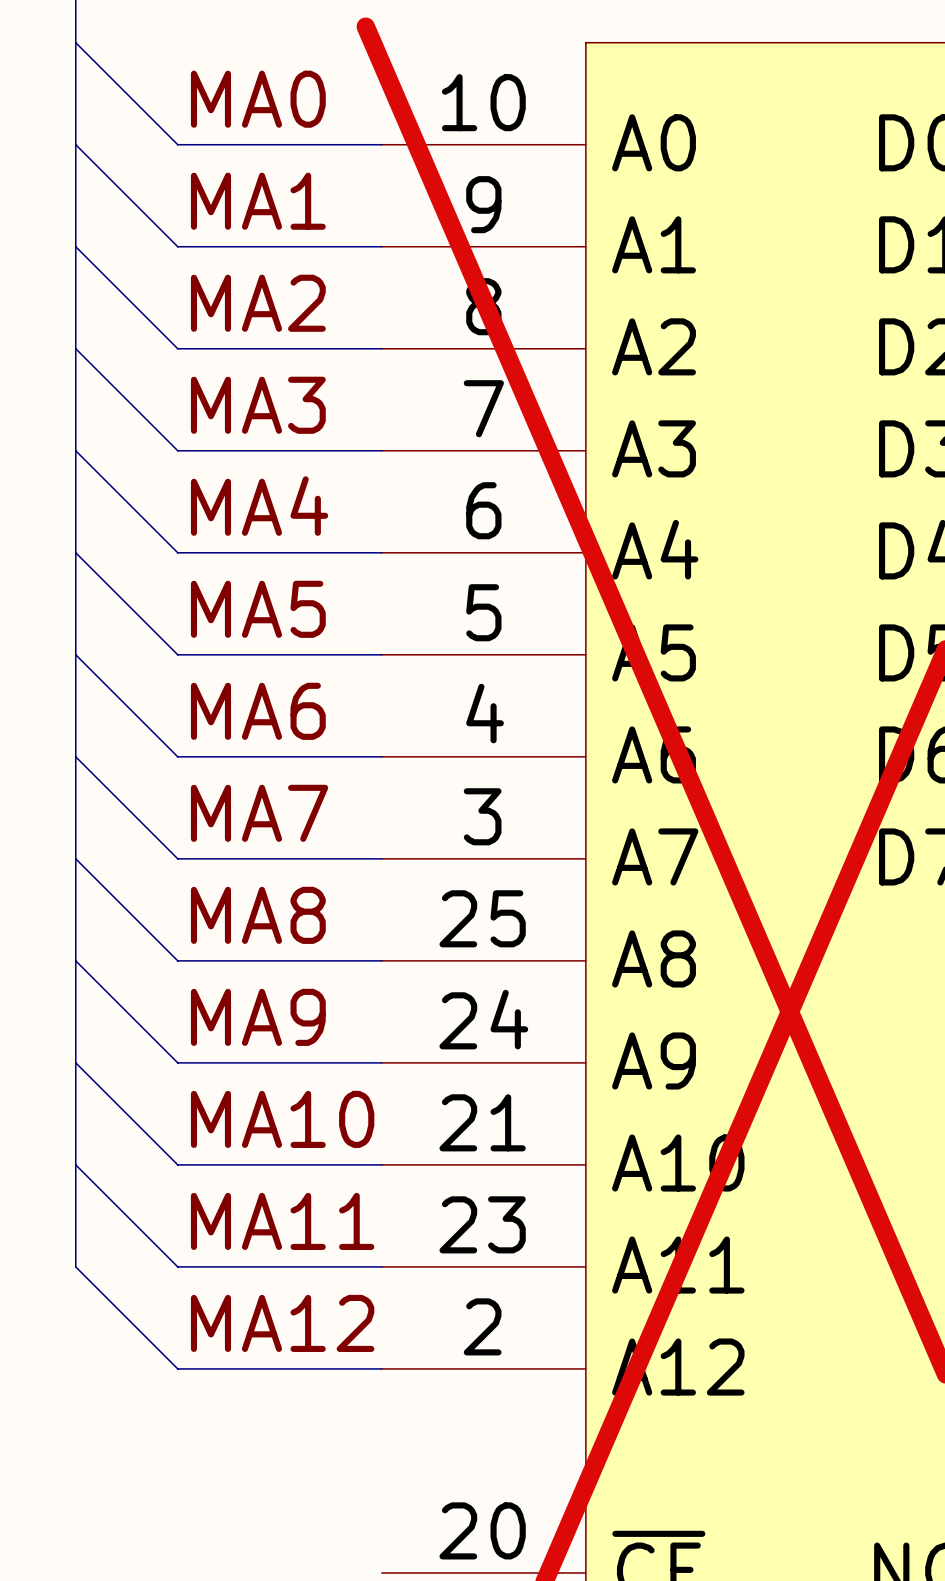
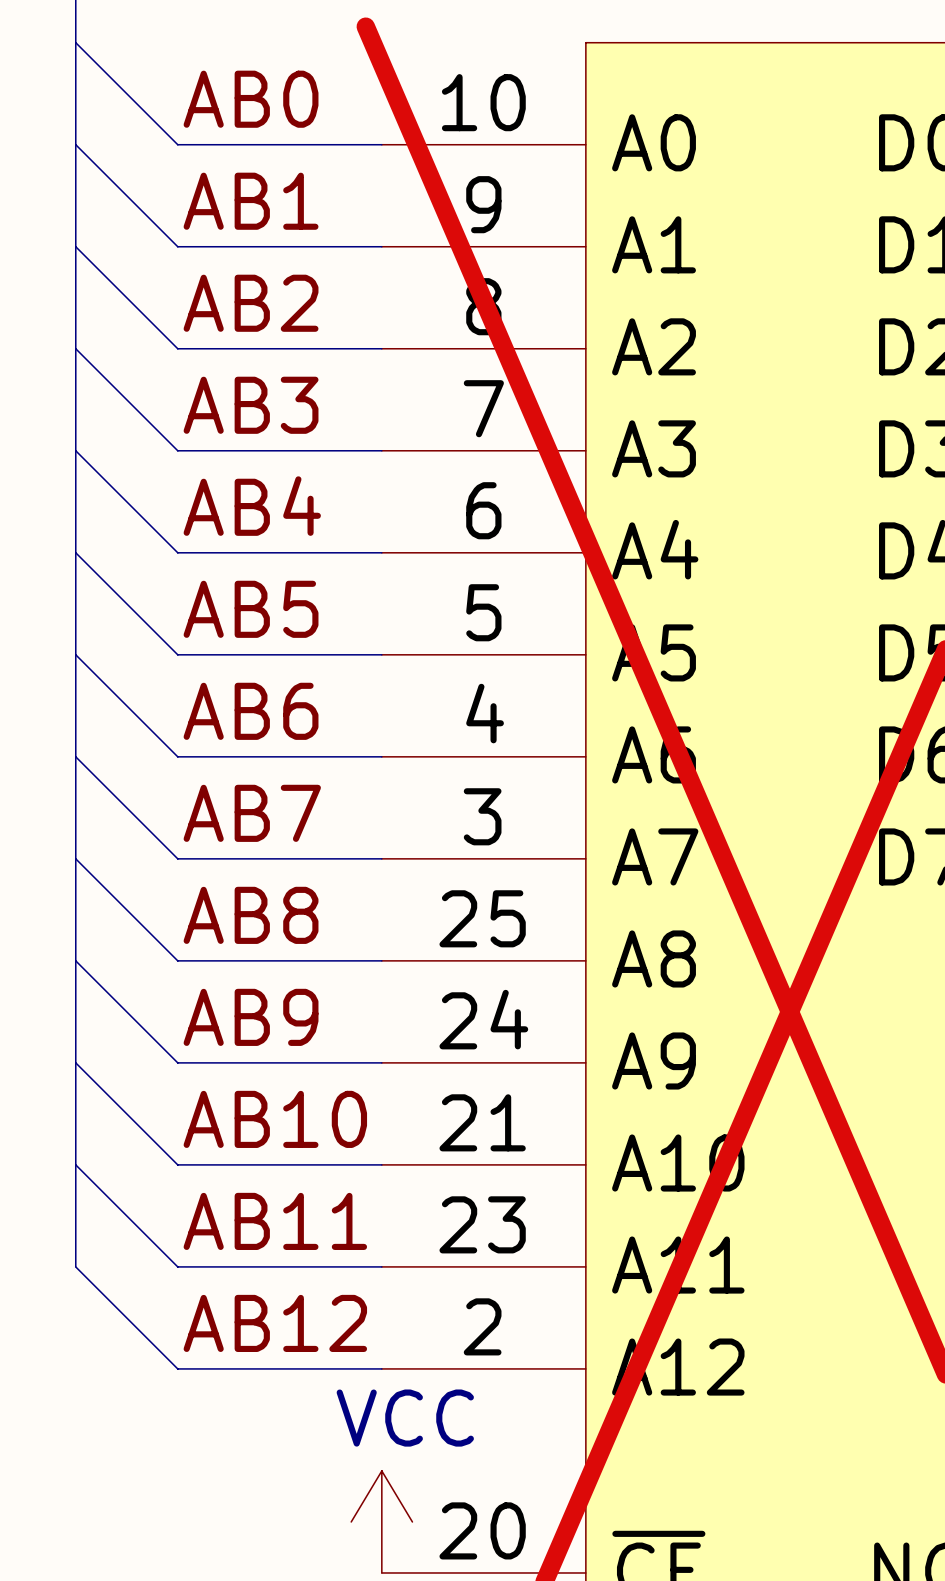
label: MA0 (258, 99) -> AB0 (251, 99)
label: MA1 (258, 201) -> AB1 (251, 201)
label: MA2 (258, 303) -> AB2 (251, 303)
label: MA3 (258, 405) -> AB3 (251, 405)
label: MA4 (259, 506) -> AB4 (252, 506)
label: MA5 (258, 609) -> AB5 (251, 609)
label: MA6 (258, 711) -> AB6 (251, 711)
label: MA7 (259, 813) -> AB7 (252, 813)
label: MA8 (258, 915) -> AB8 (251, 915)
label: MA9 (258, 1017) -> AB9 (251, 1017)
label: MA10 (282, 1119) -> AB10 (275, 1119)
label: MA11 (282, 1221) -> AB11 (275, 1221)
label: MA12 (282, 1323) -> AB12 (275, 1323)
power symbol: none -> VCC (381, 1521)

